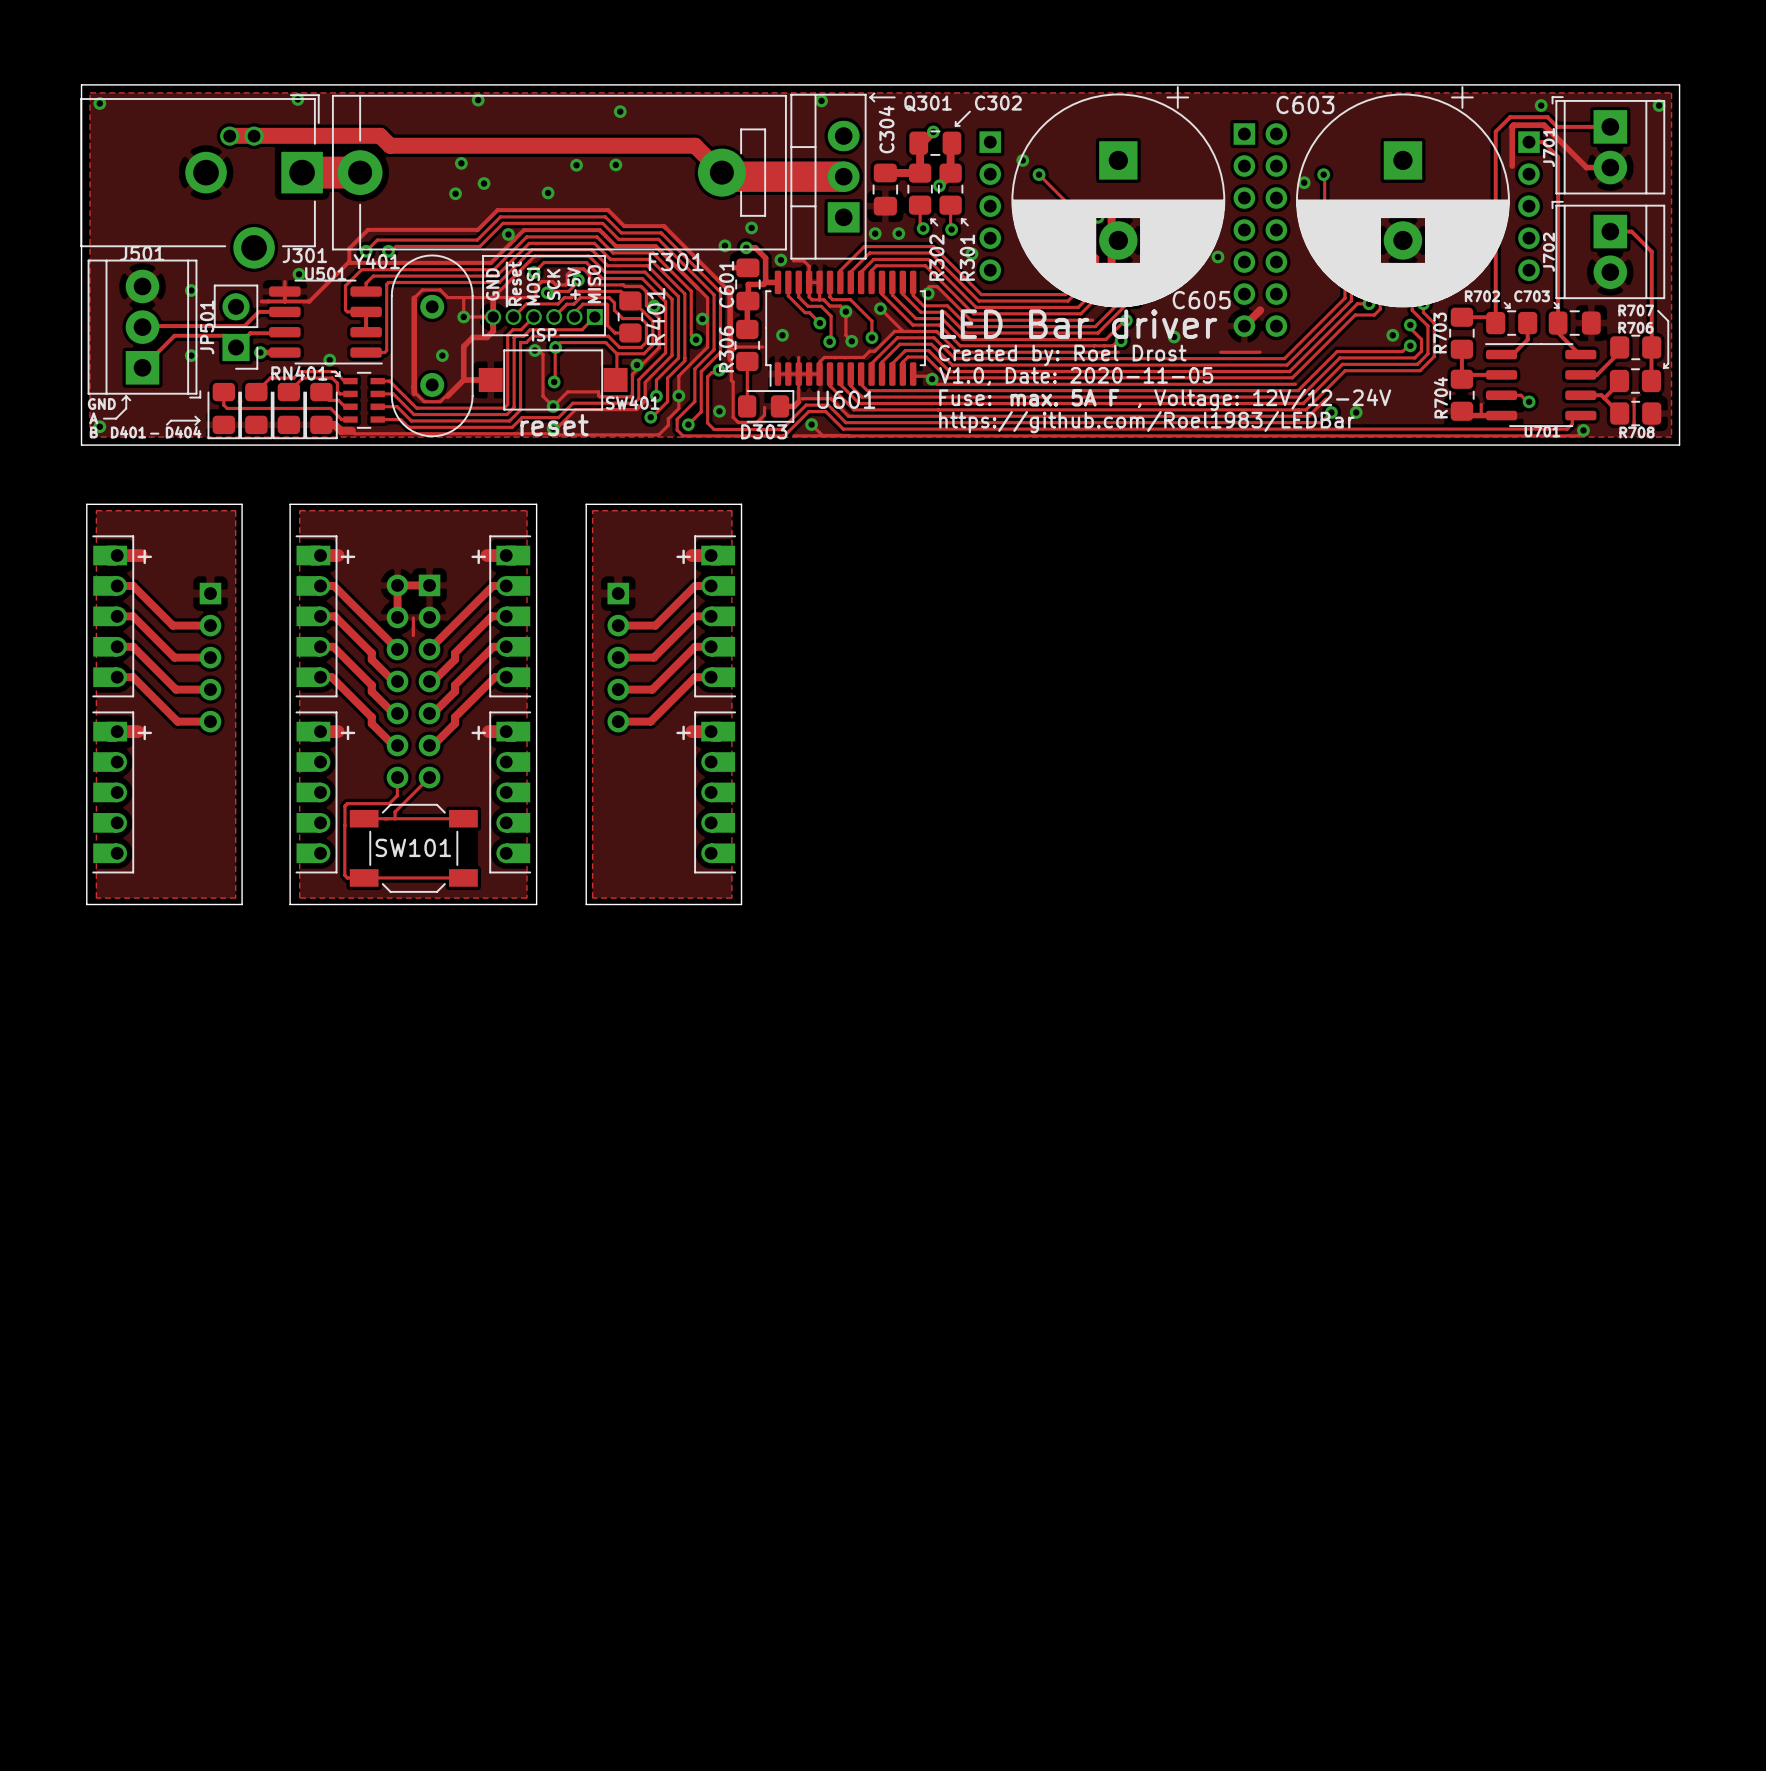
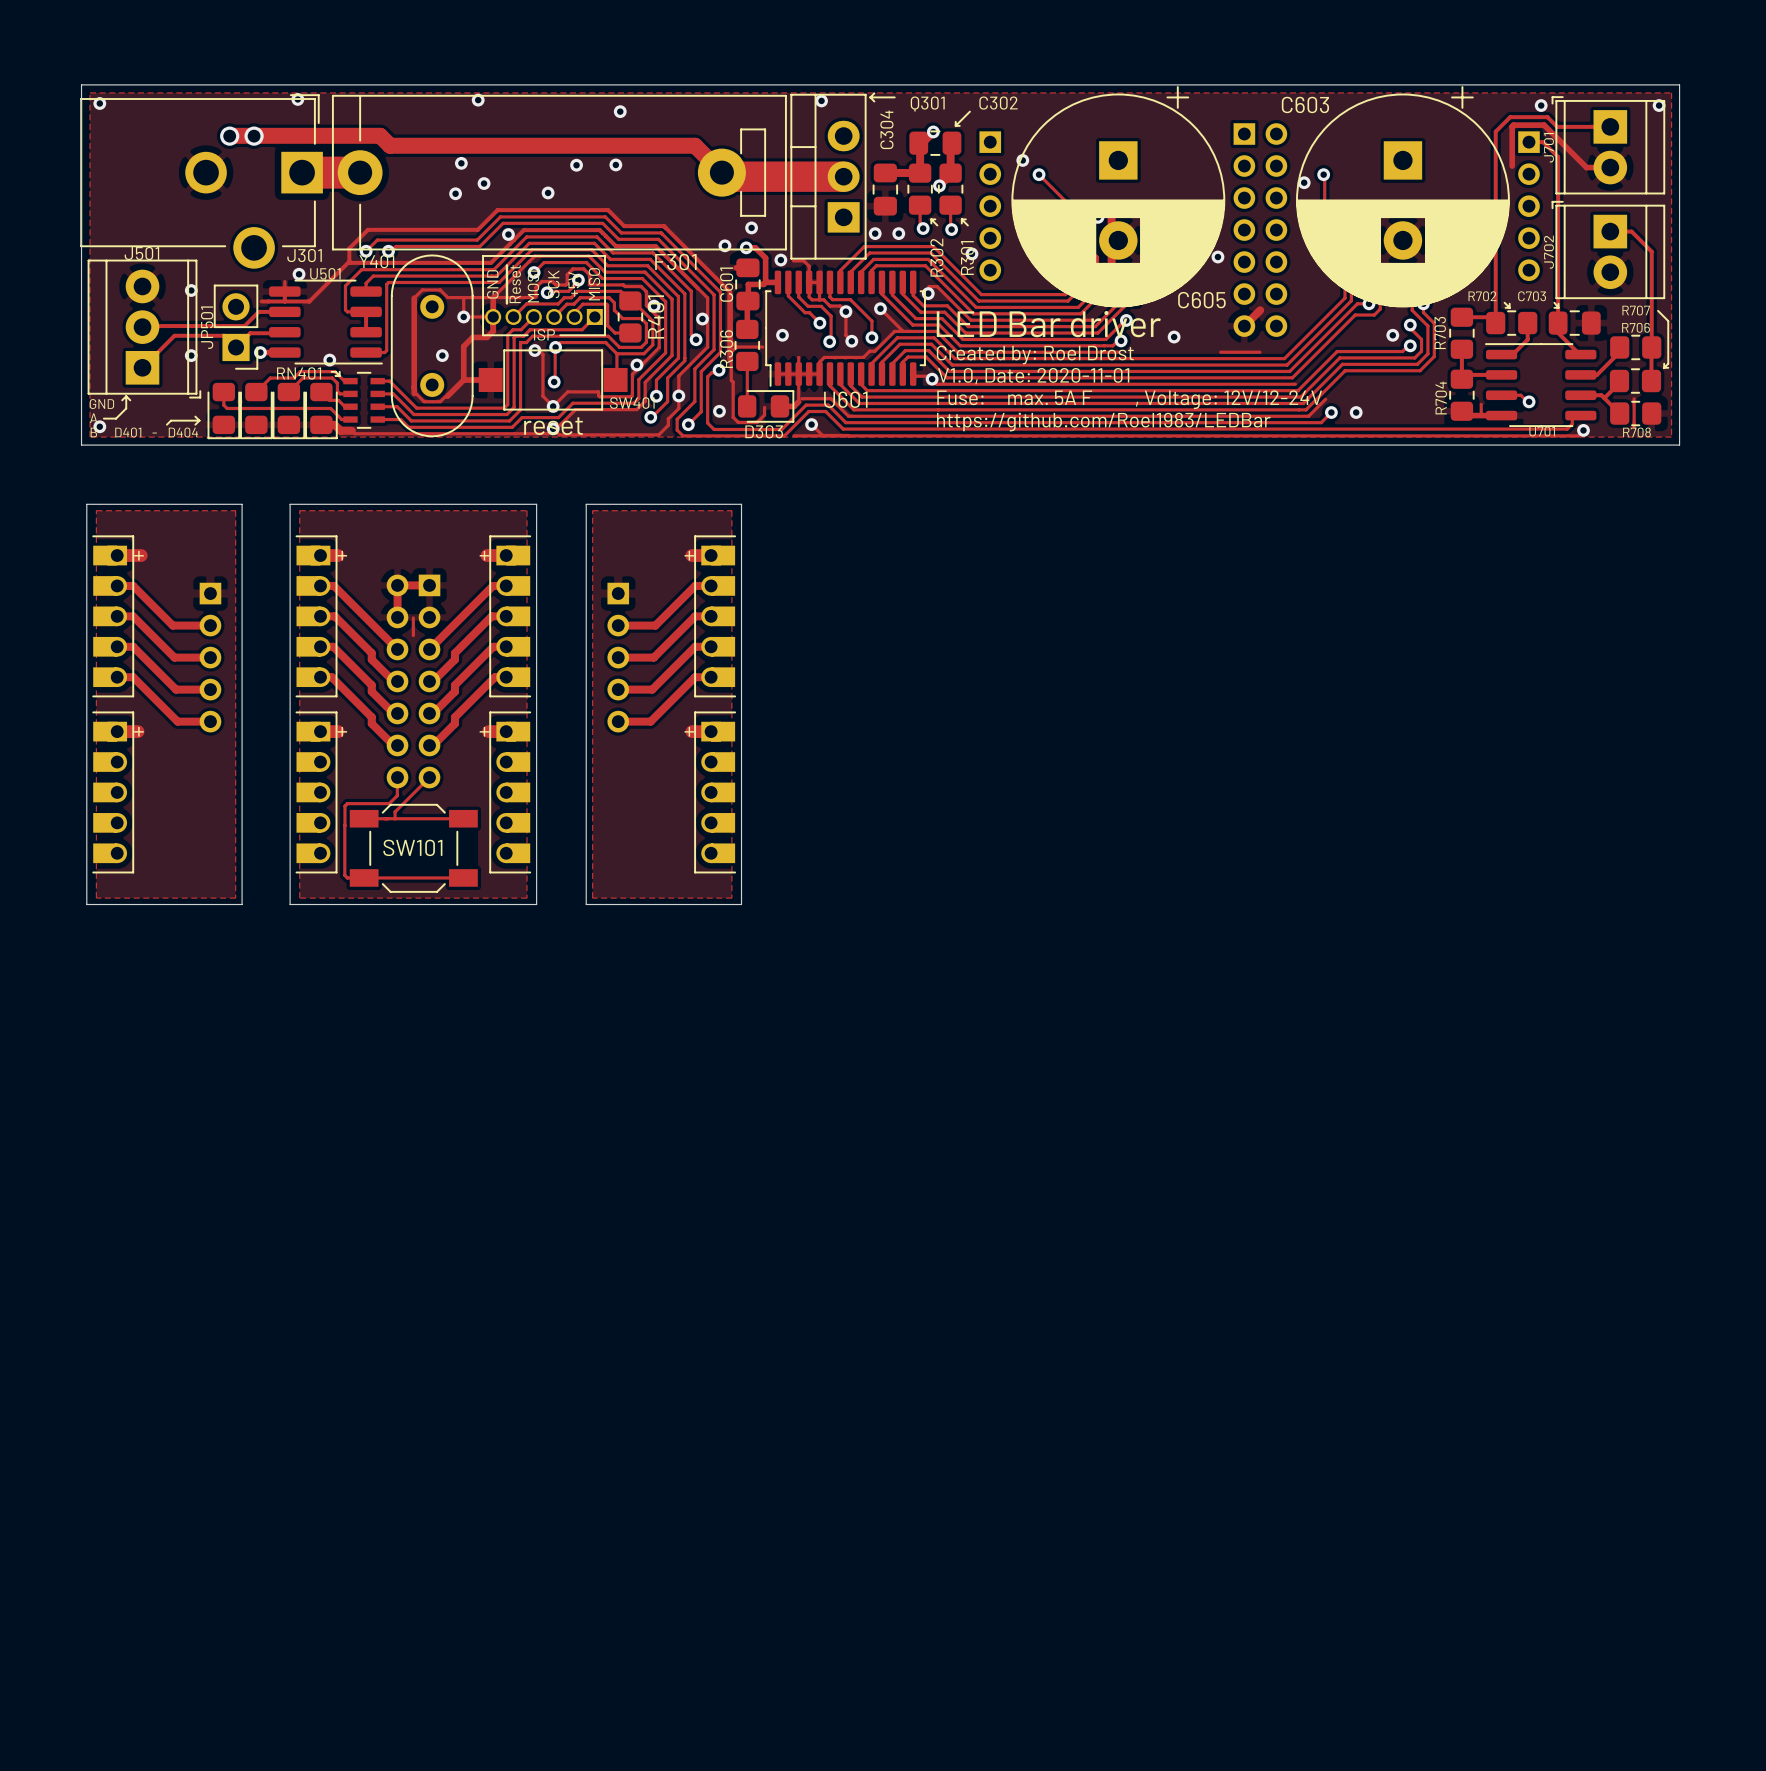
text: V1.0, Date: 2020-11-05 (1076, 376) -> V1.0, Date: 2020-11-01 (1033, 376)

